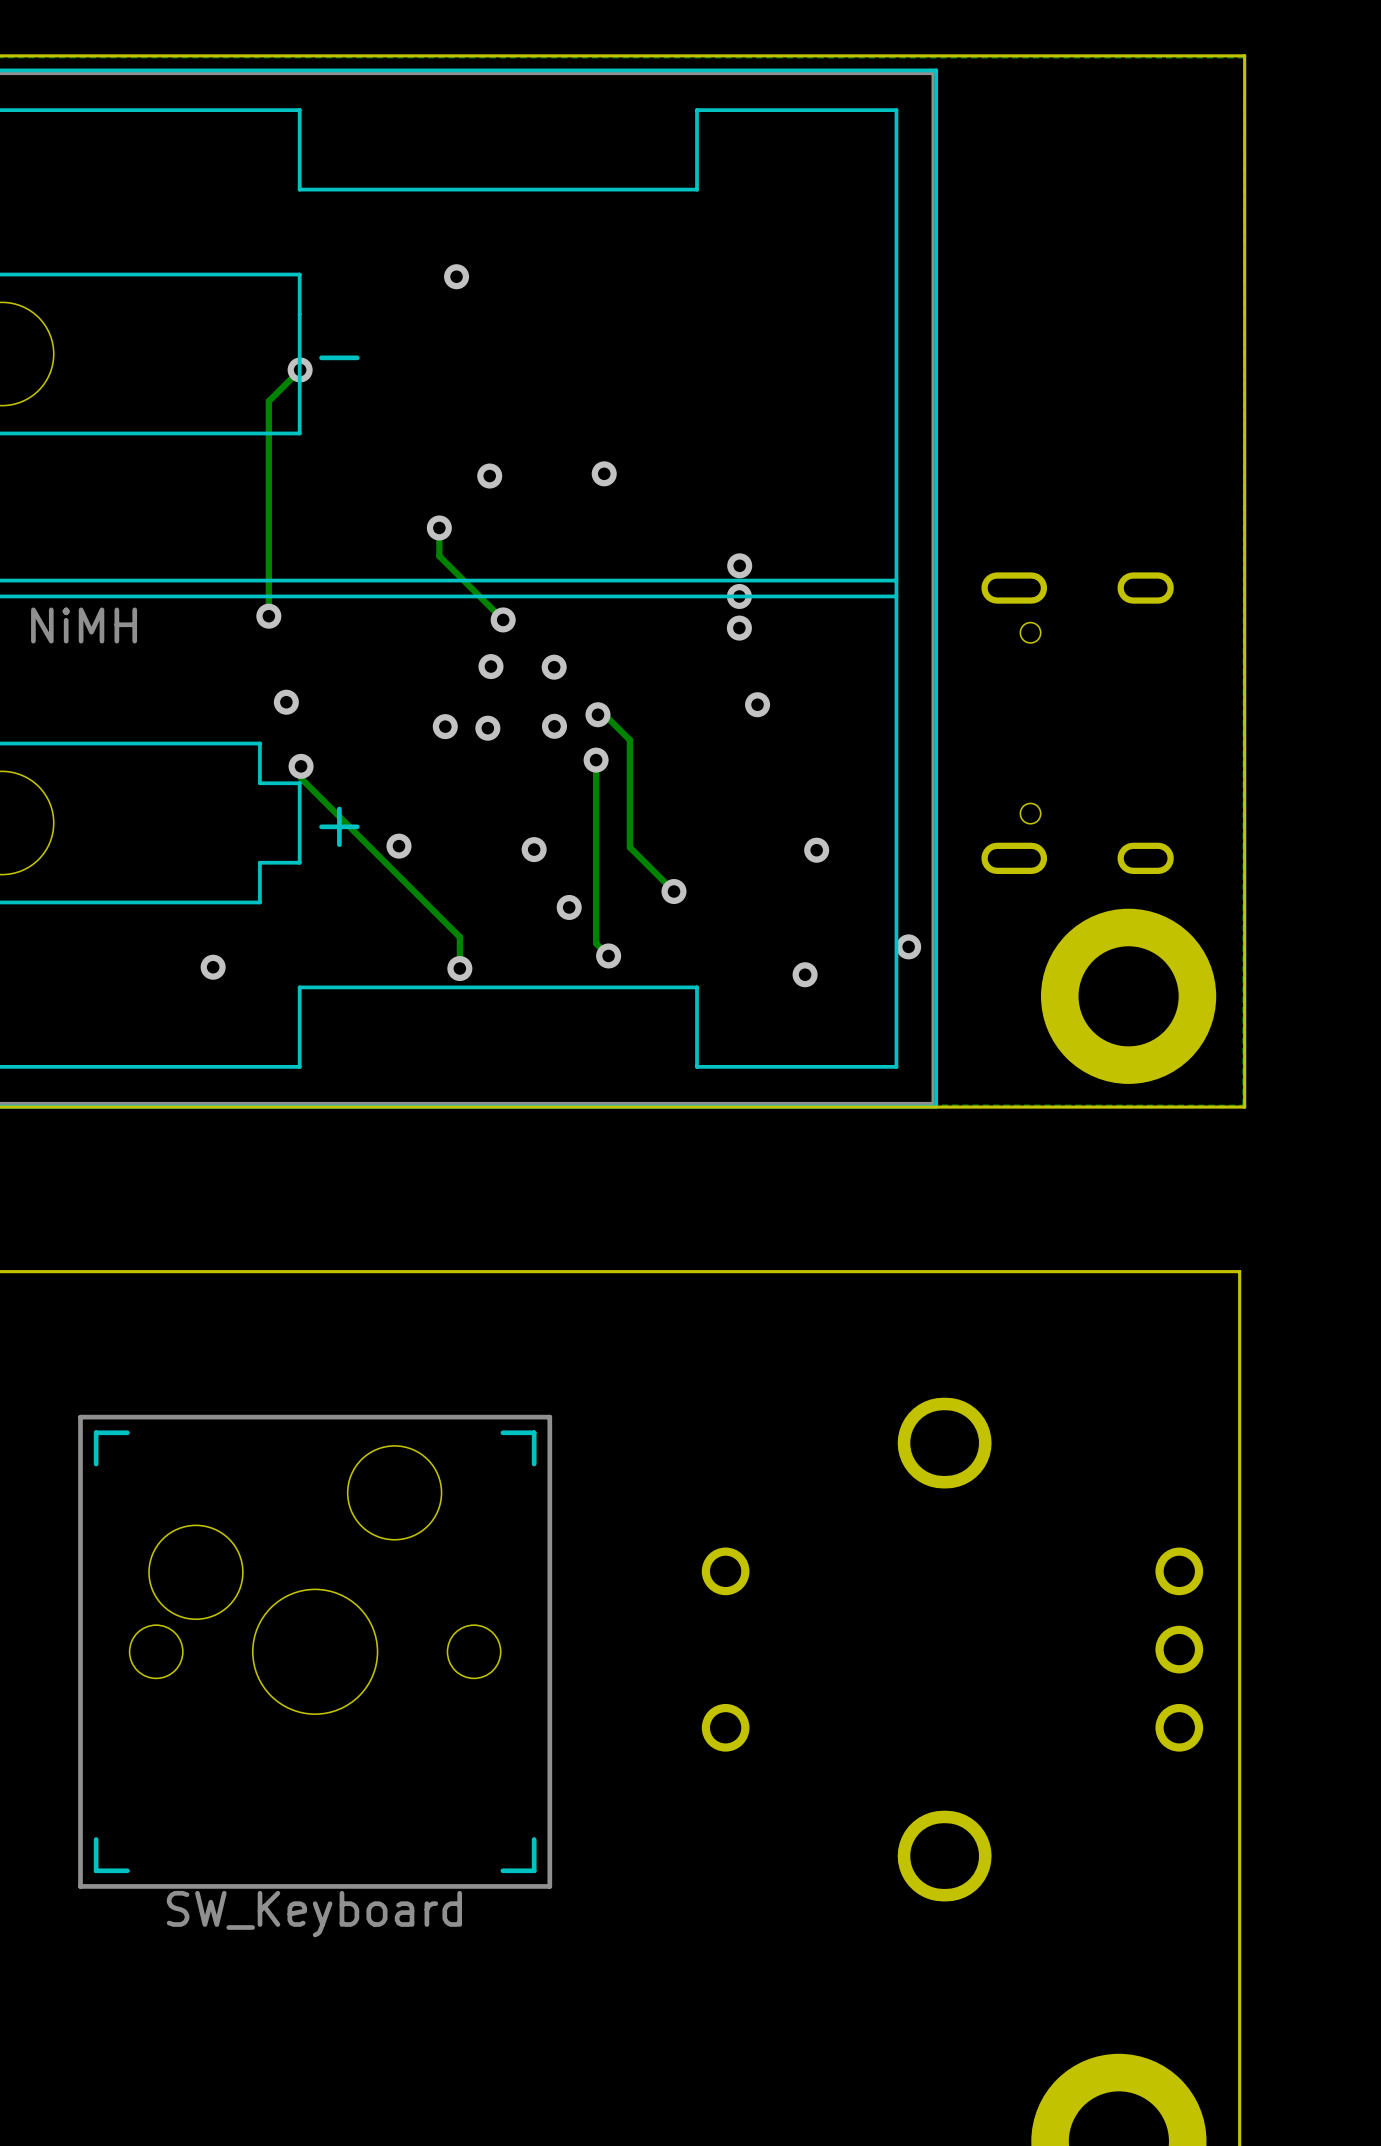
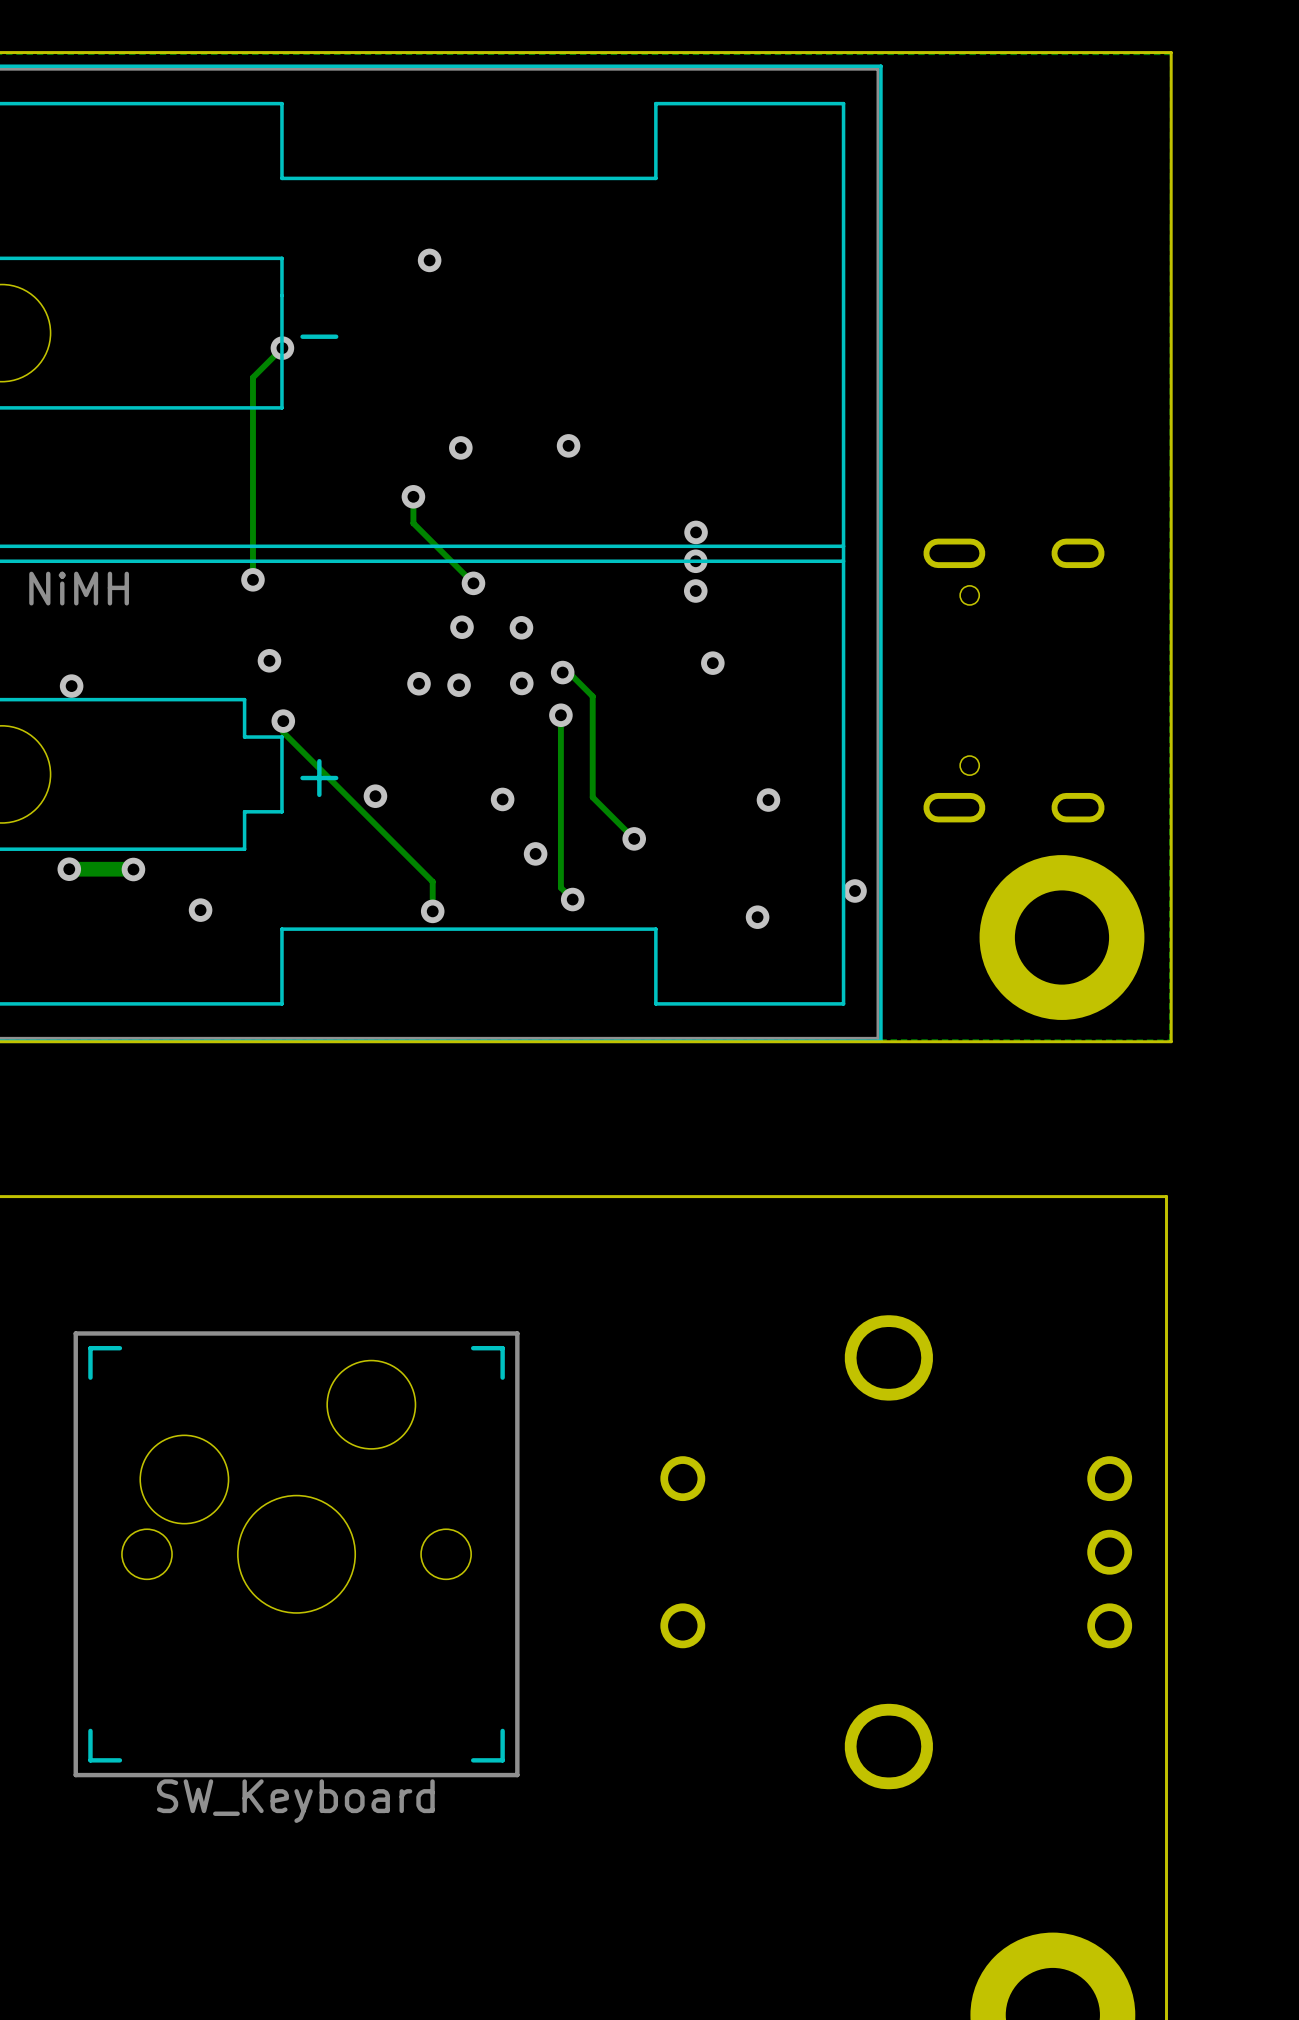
via: none -> (71, 686)
via: none -> (69, 869)
track: none -> (133, 869) (69, 869)
via: none -> (133, 869)

